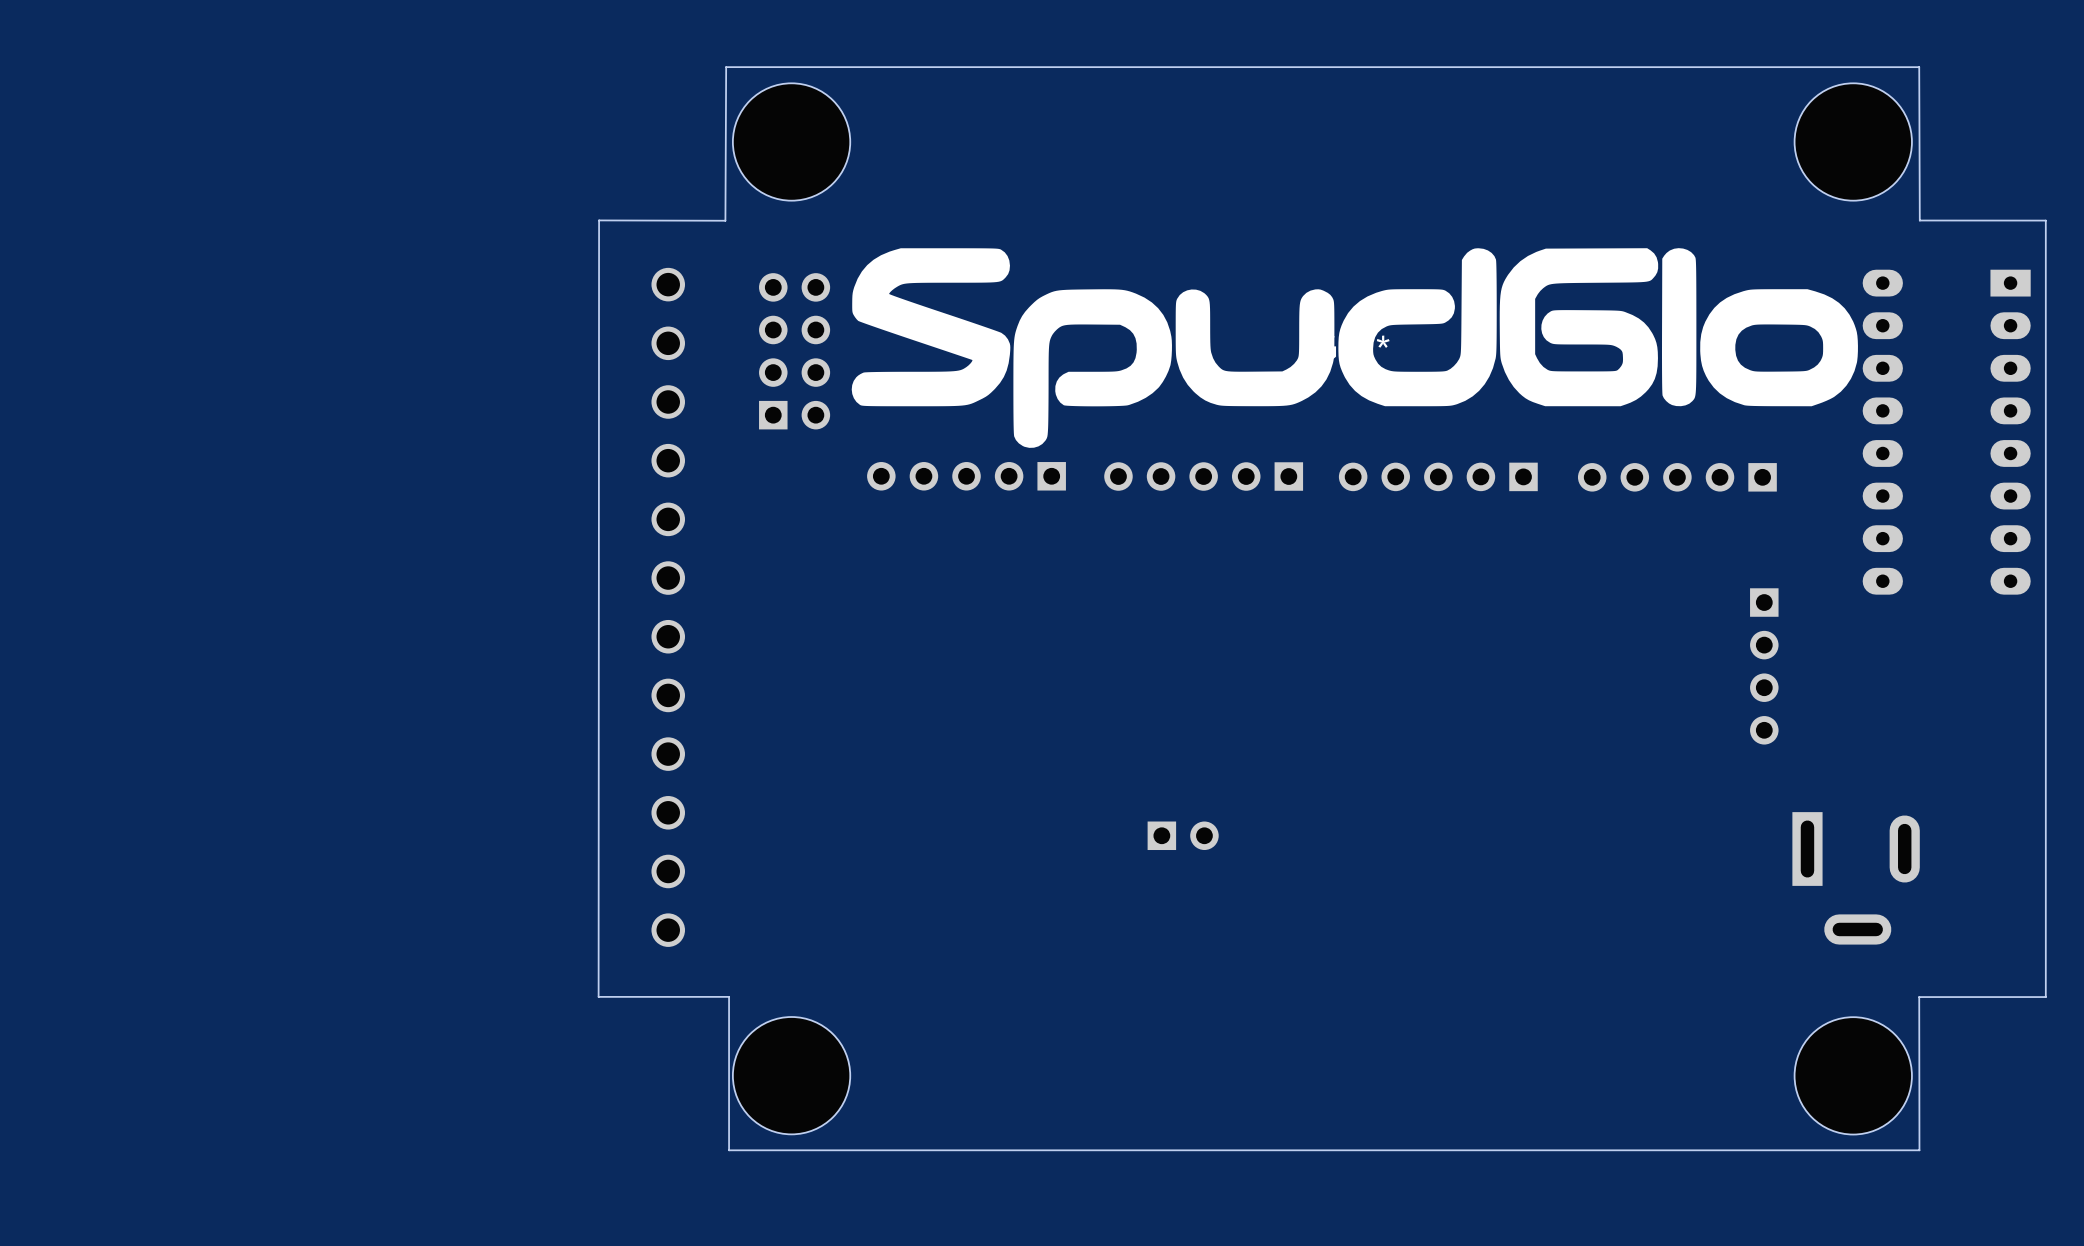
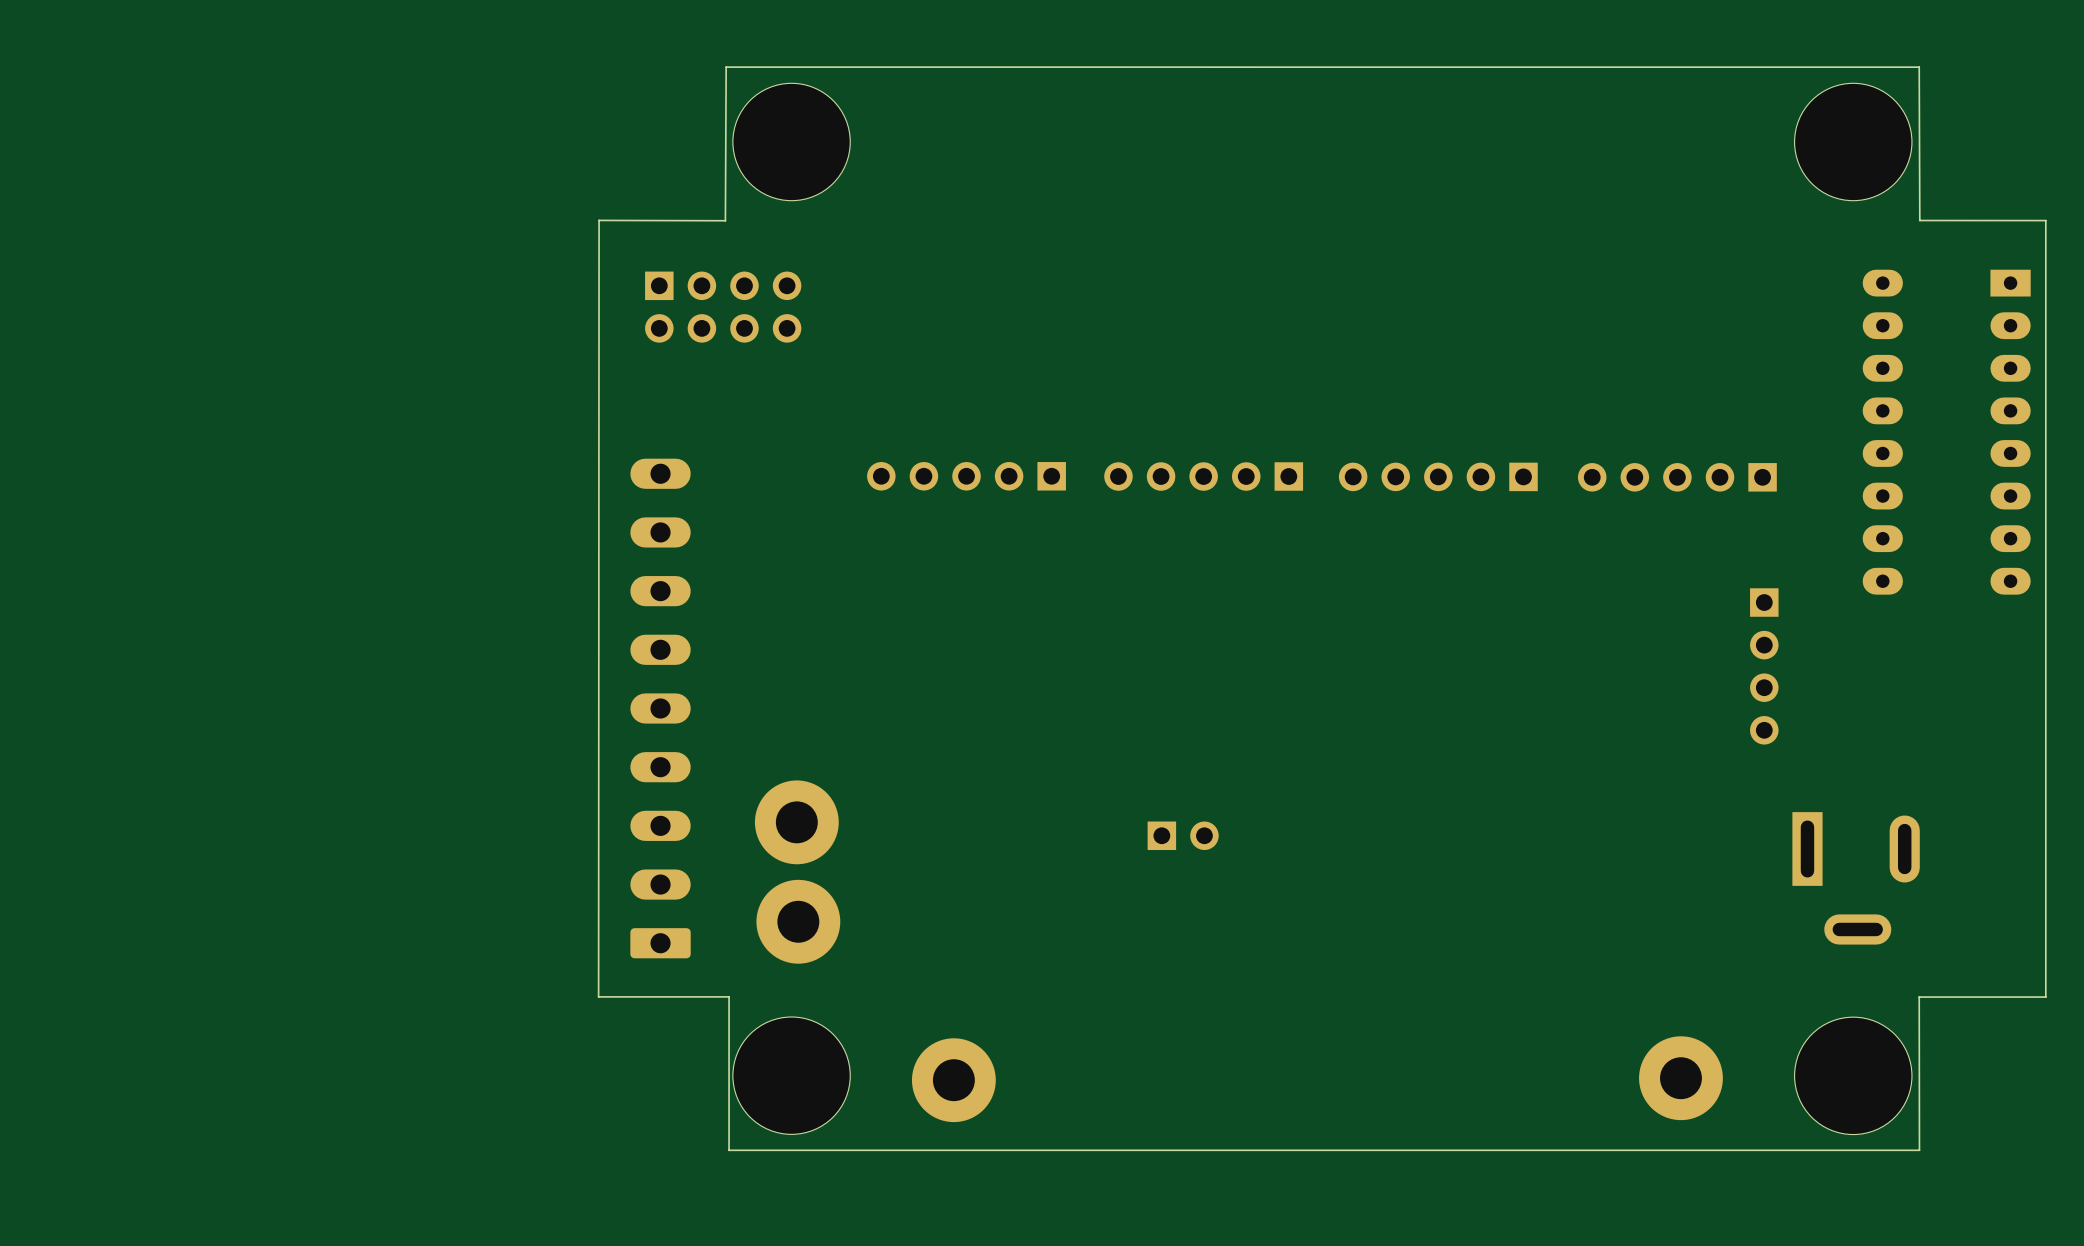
part: (1354, 348) -> none
part rotation: 0° (794, 351) -> 90° clockwise (723, 307)
part: (668, 607) -> none
part: none -> (660, 708)
part: none -> (796, 822)
part: none -> (798, 921)
part: none -> (1680, 1078)
part: none -> (953, 1080)

